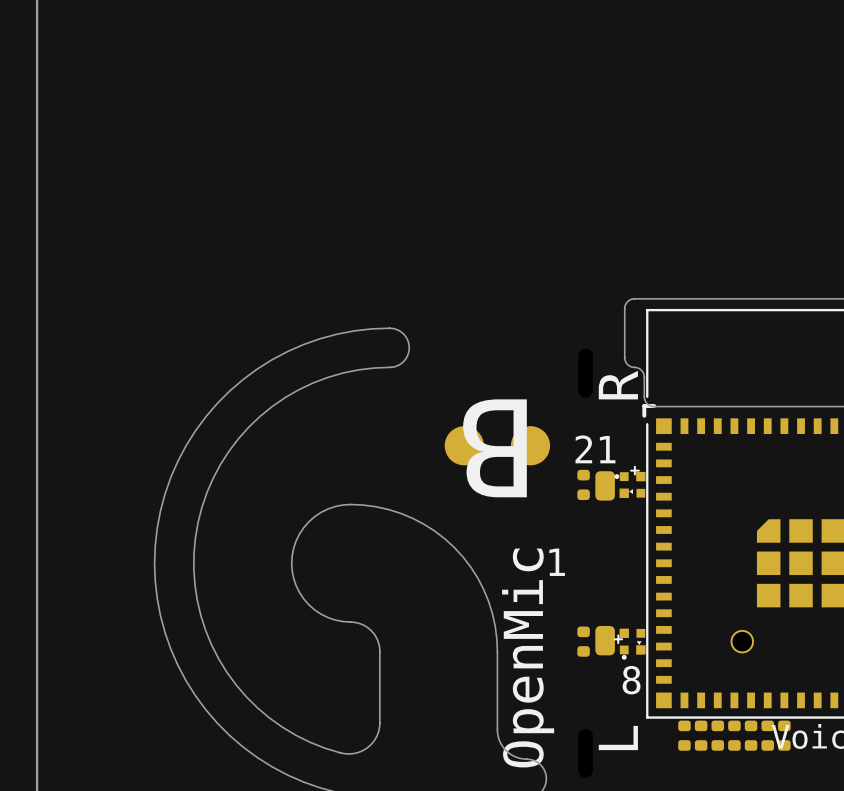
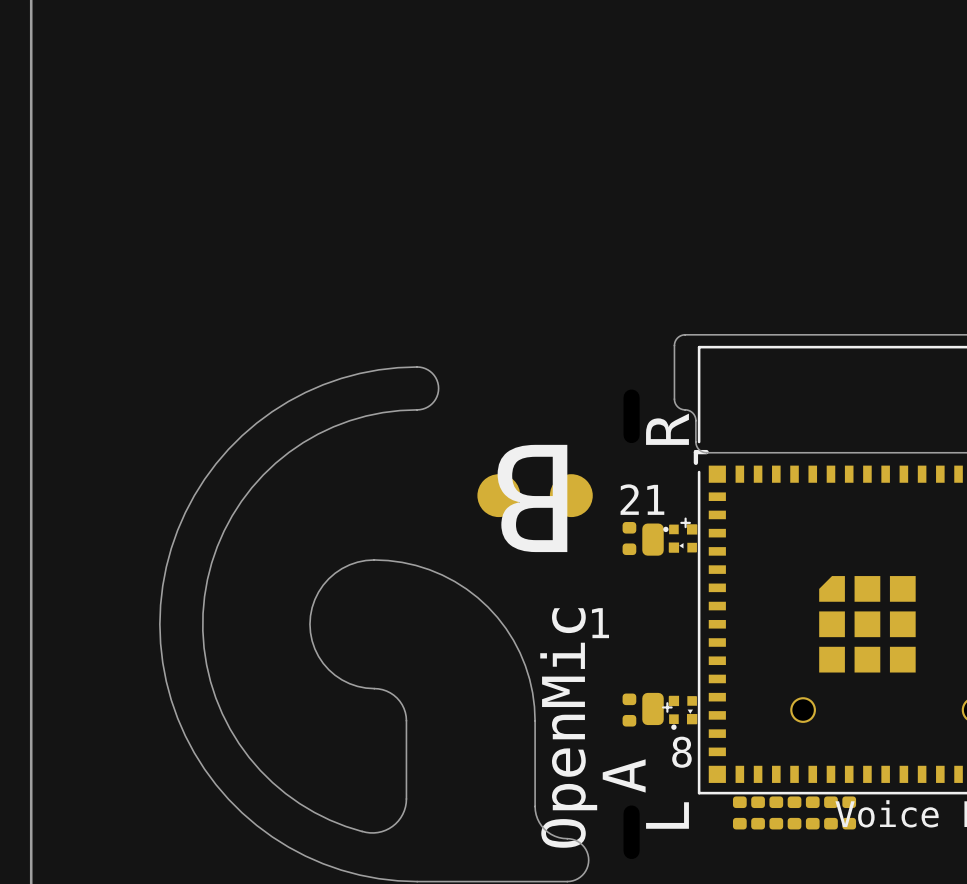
text: none -> A (624, 775)

